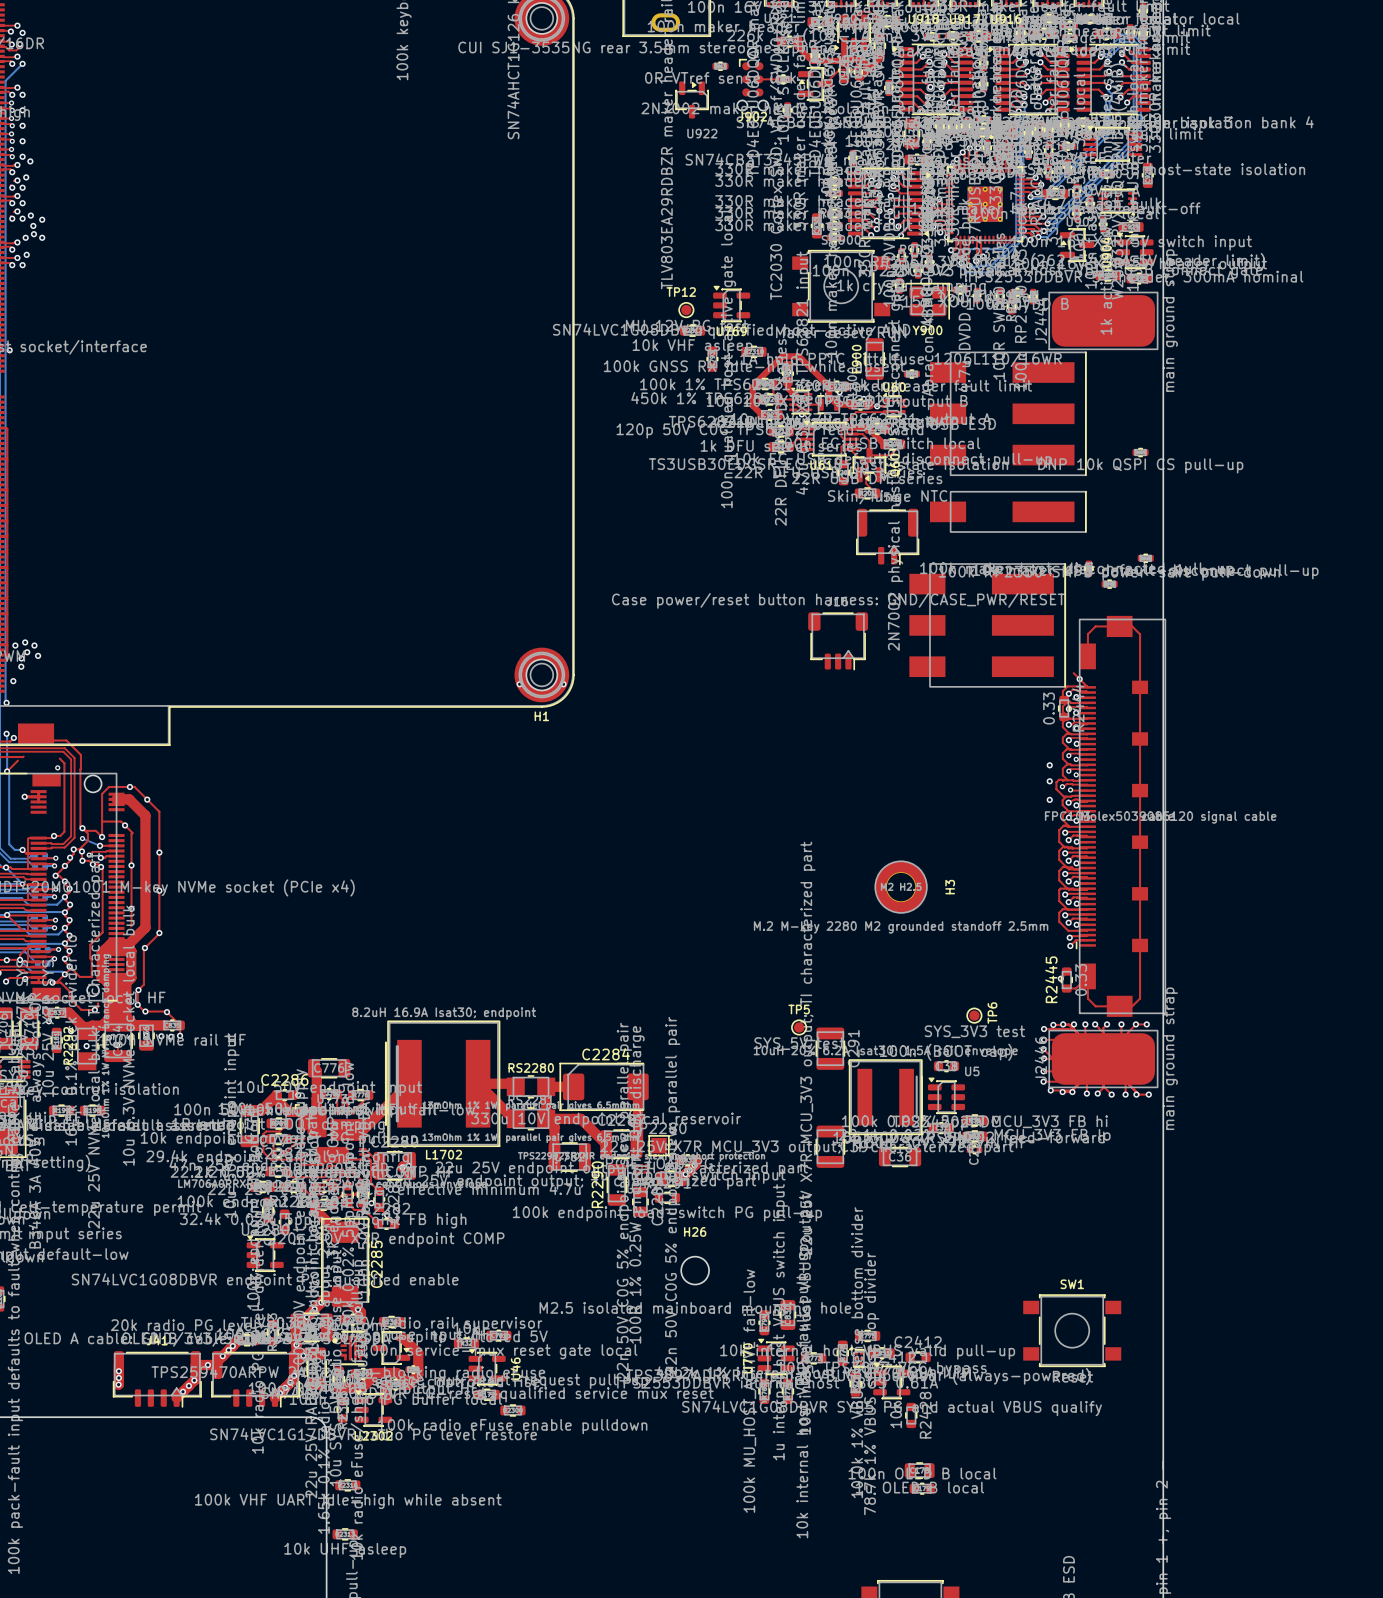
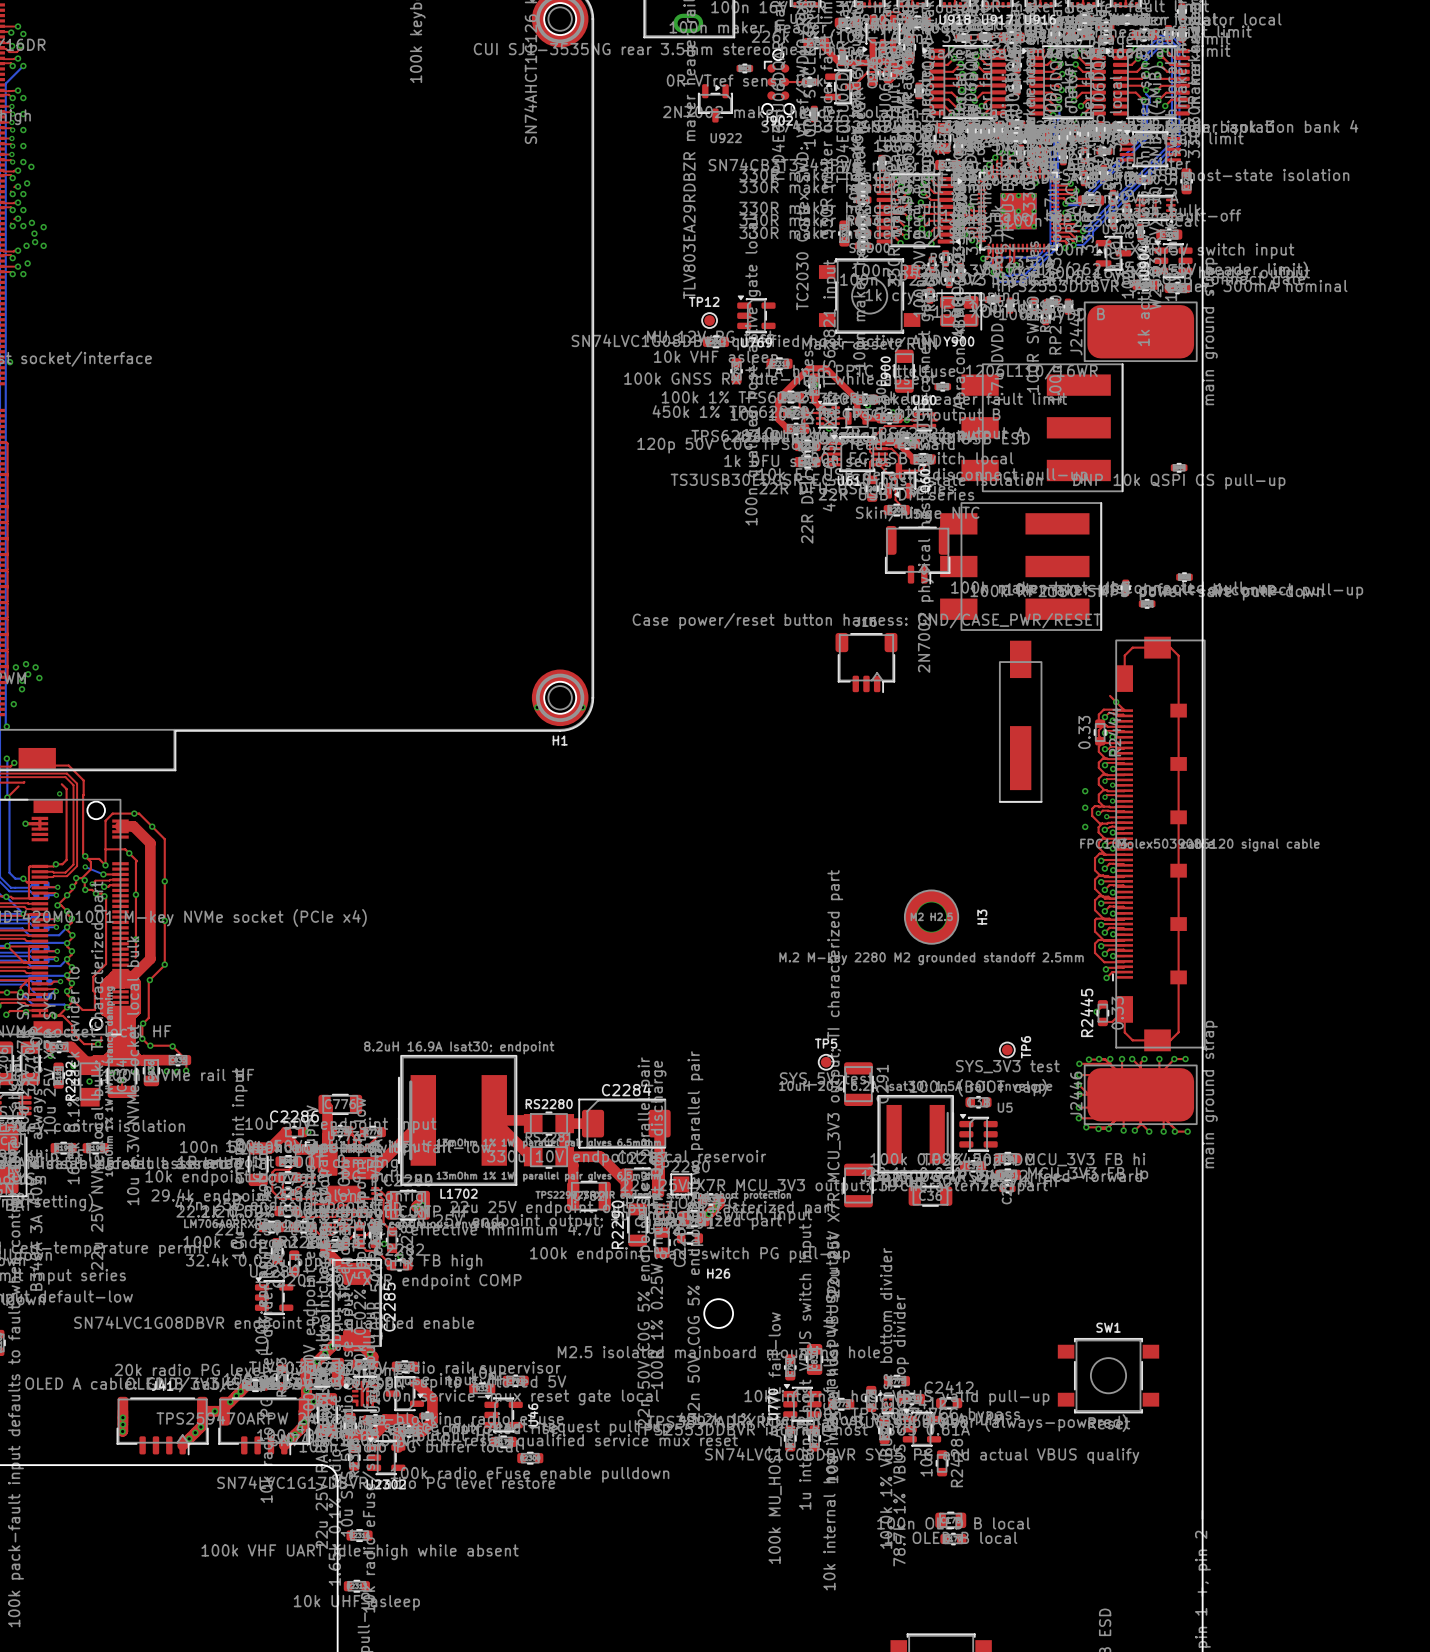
part rotation: 0° (1008, 511) -> 90° clockwise (1020, 721)
part position: (1008, 511) -> (1020, 721)
part position: (987, 625) -> (1020, 566)

